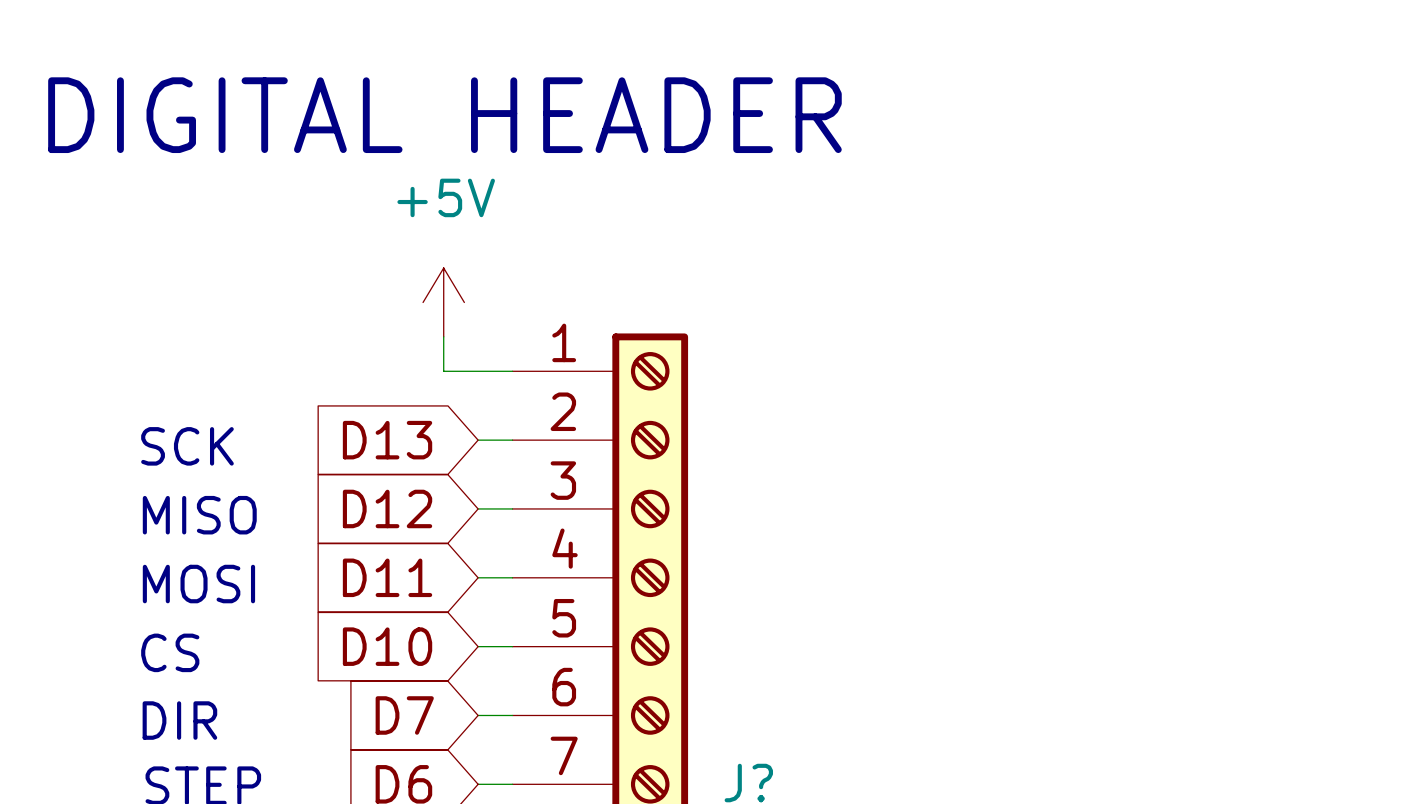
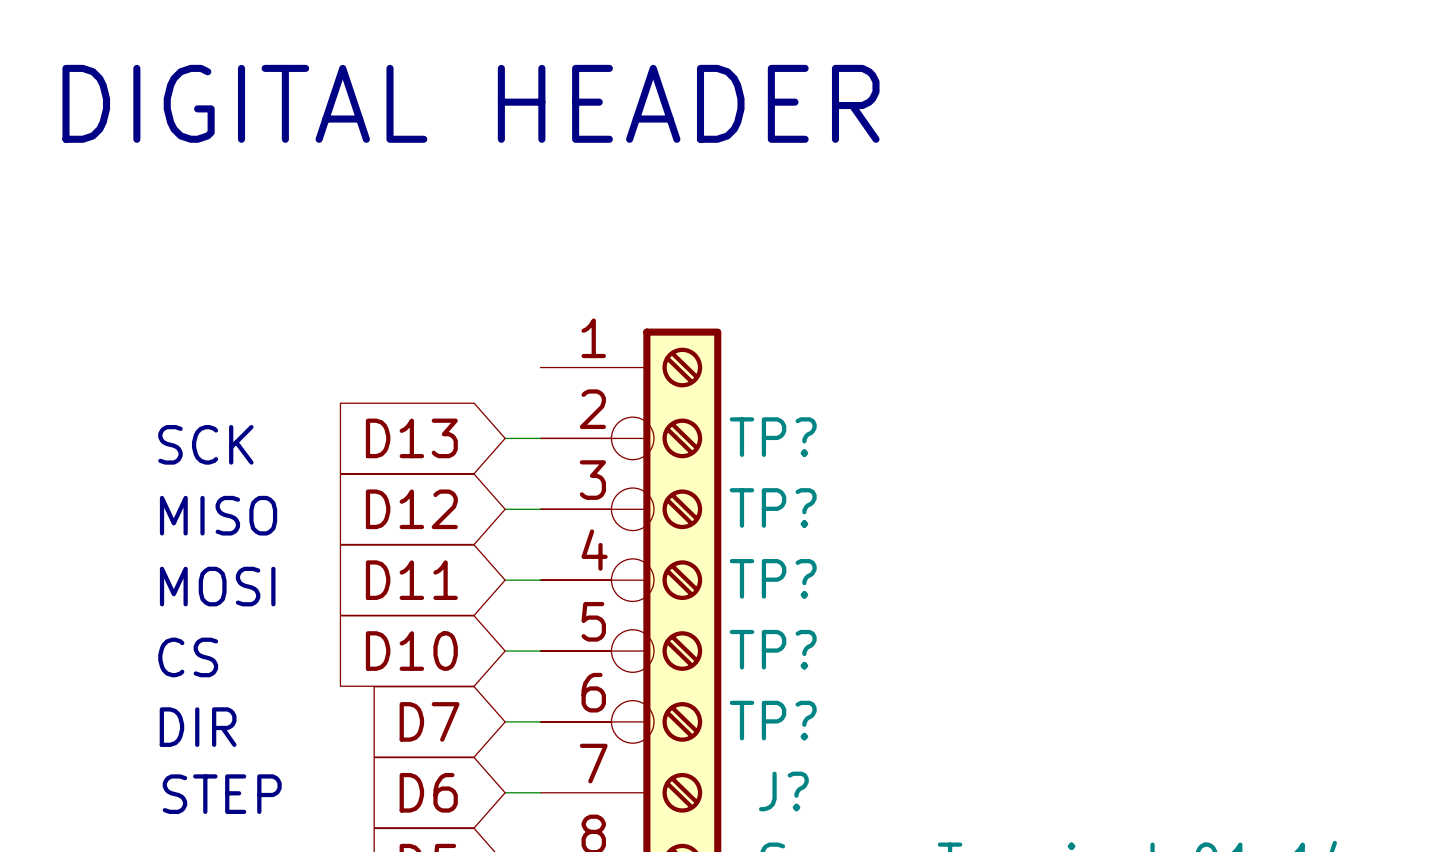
power symbol: +5V (443, 302) -> none
wire: (443, 336) (443, 371) (512, 371) -> none
TP?: none -> (597, 438)
TP?: none -> (597, 509)
TP?: none -> (597, 580)
TP?: none -> (597, 651)
TP?: none -> (597, 721)

